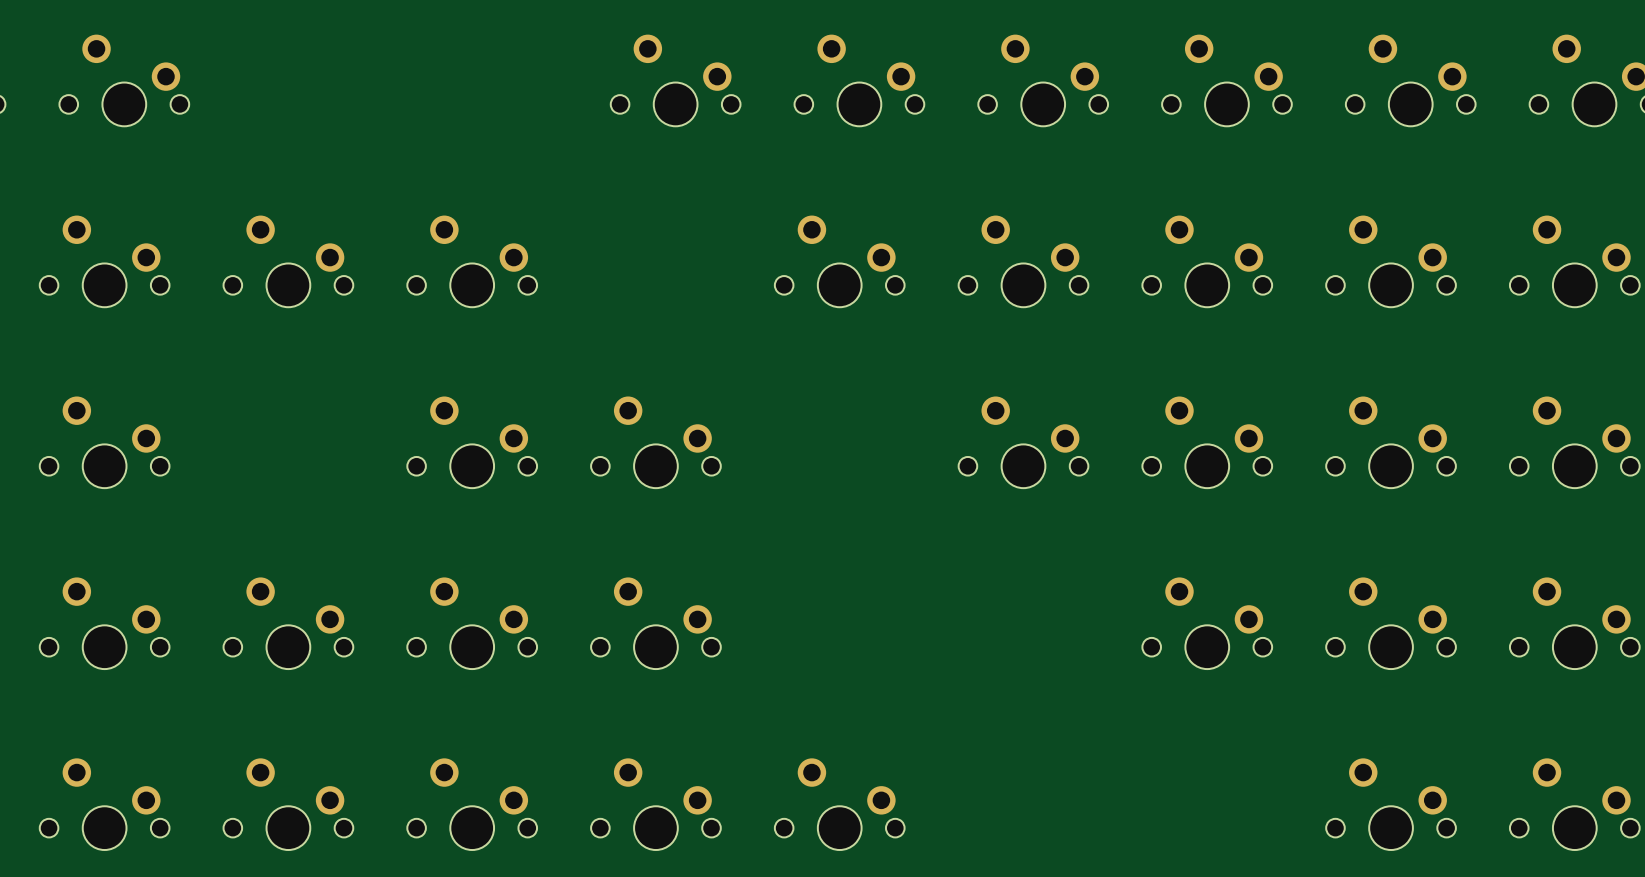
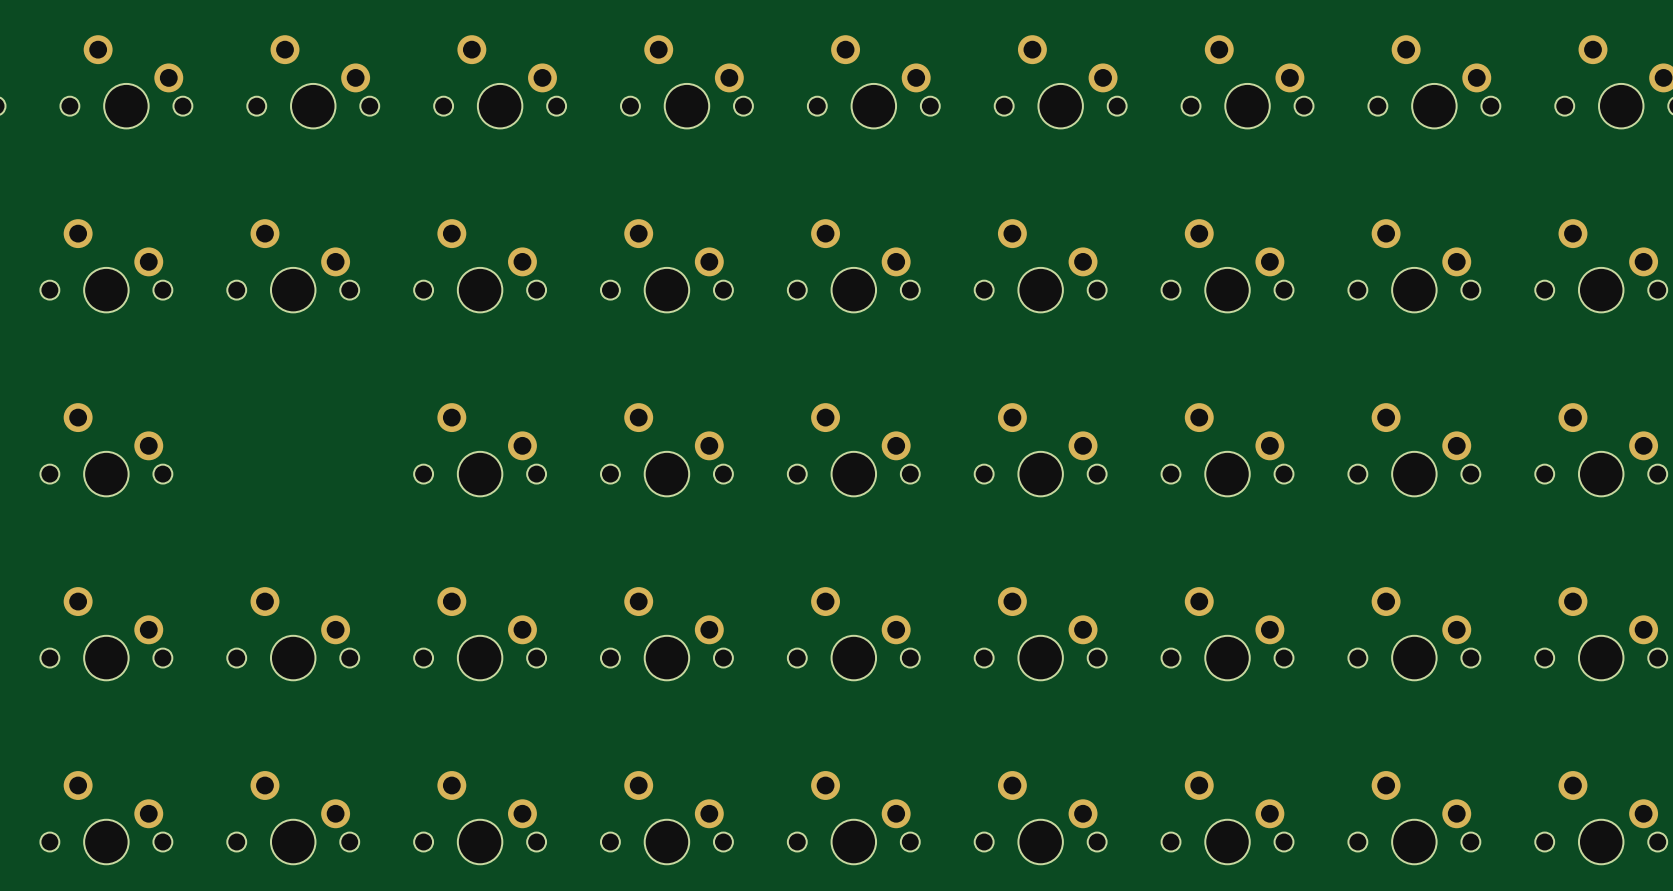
part: none -> (313, 81)
part: none -> (500, 81)
part: none -> (666, 265)
part: none -> (853, 449)
part: none -> (853, 633)
part: none -> (1040, 633)
part: none -> (1040, 817)
part: none -> (1227, 817)

